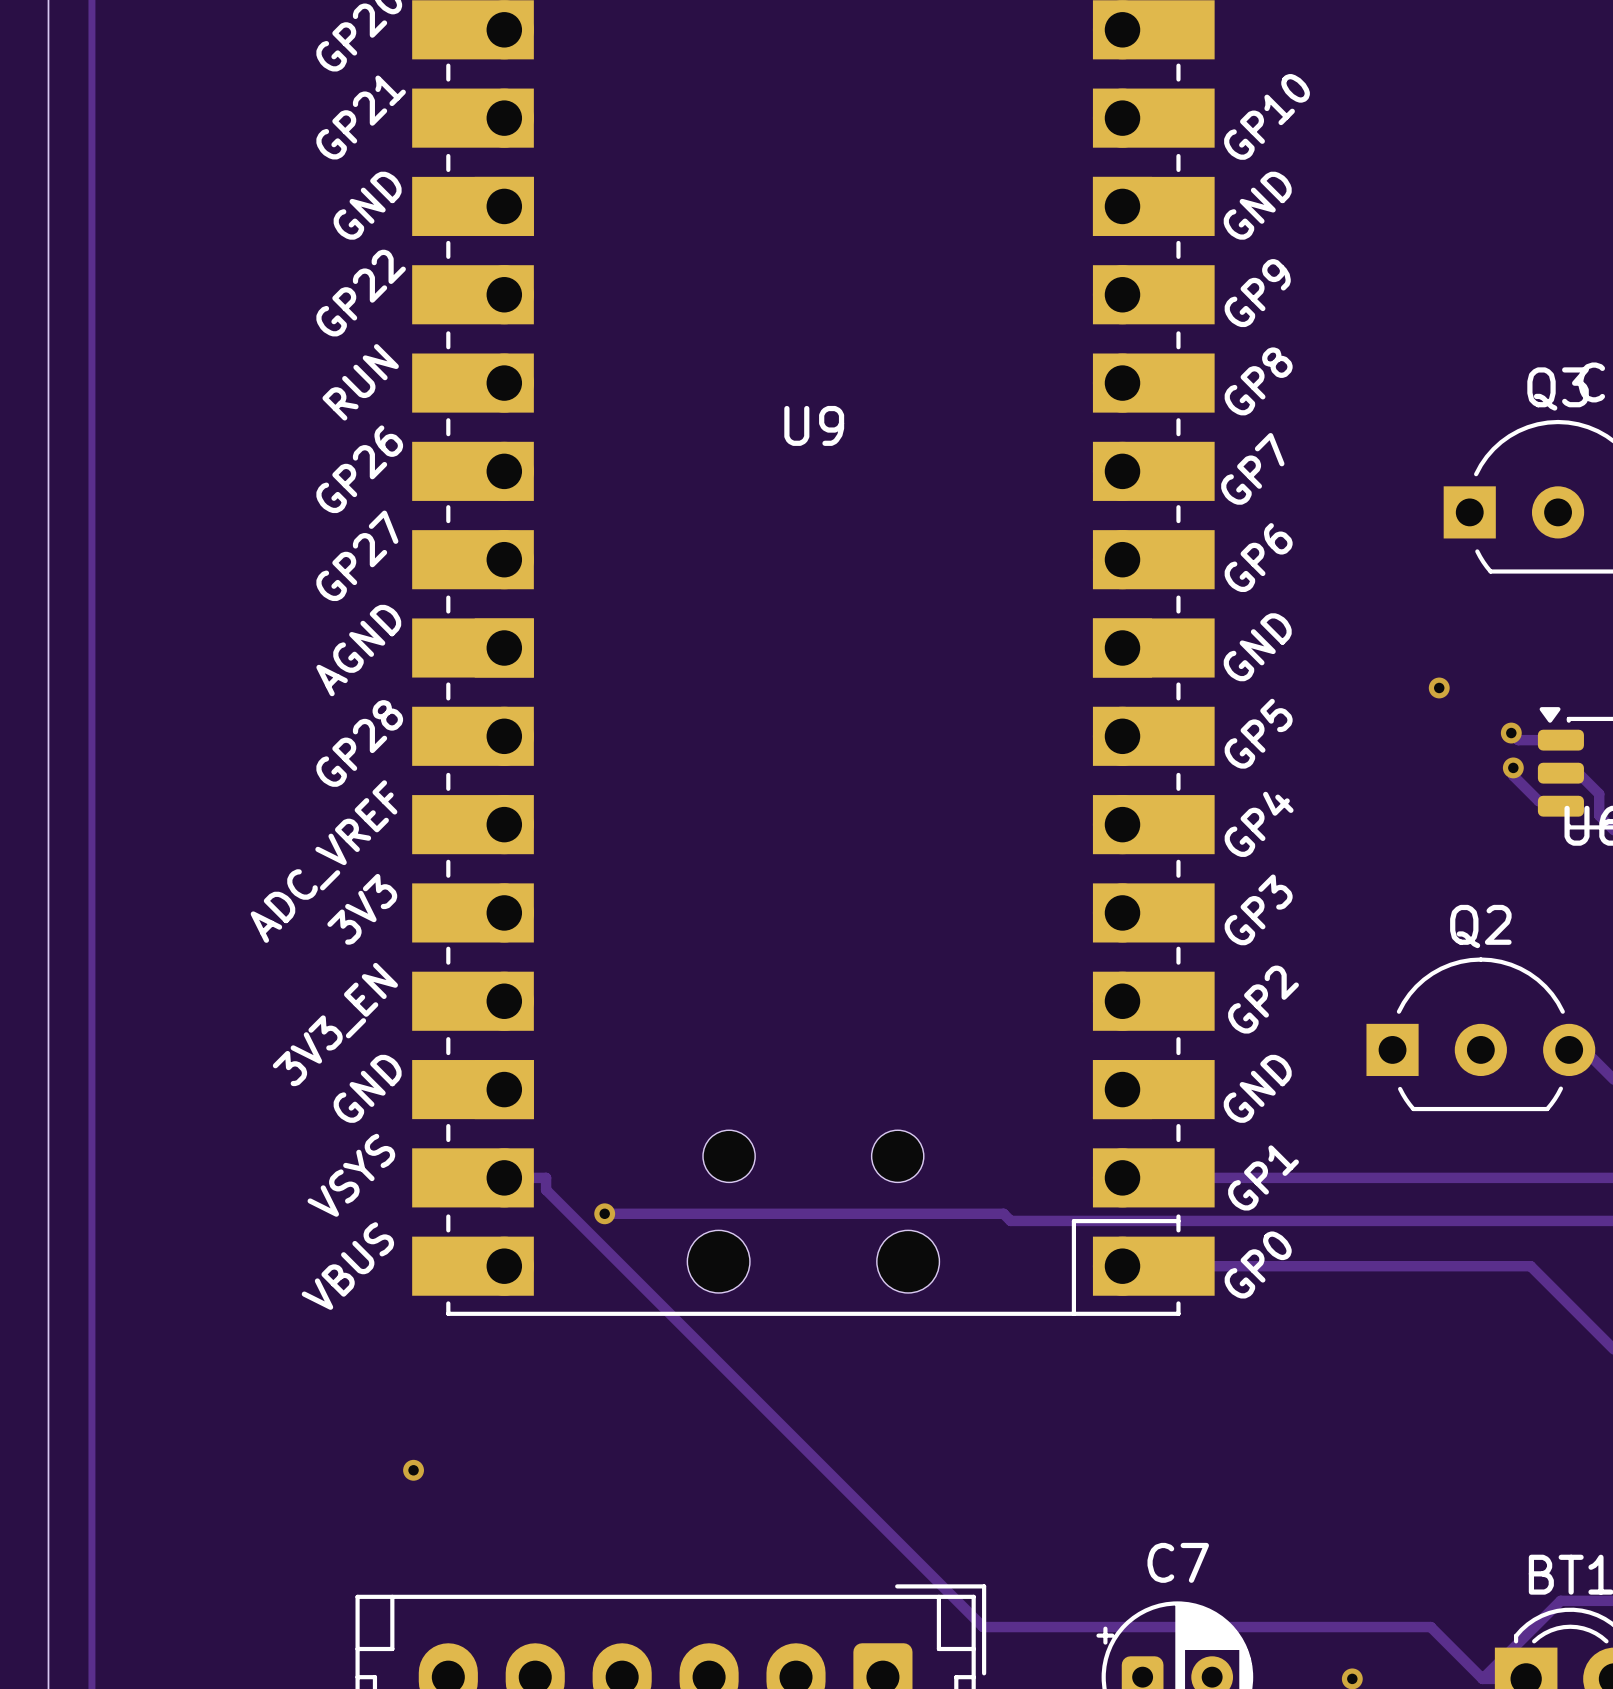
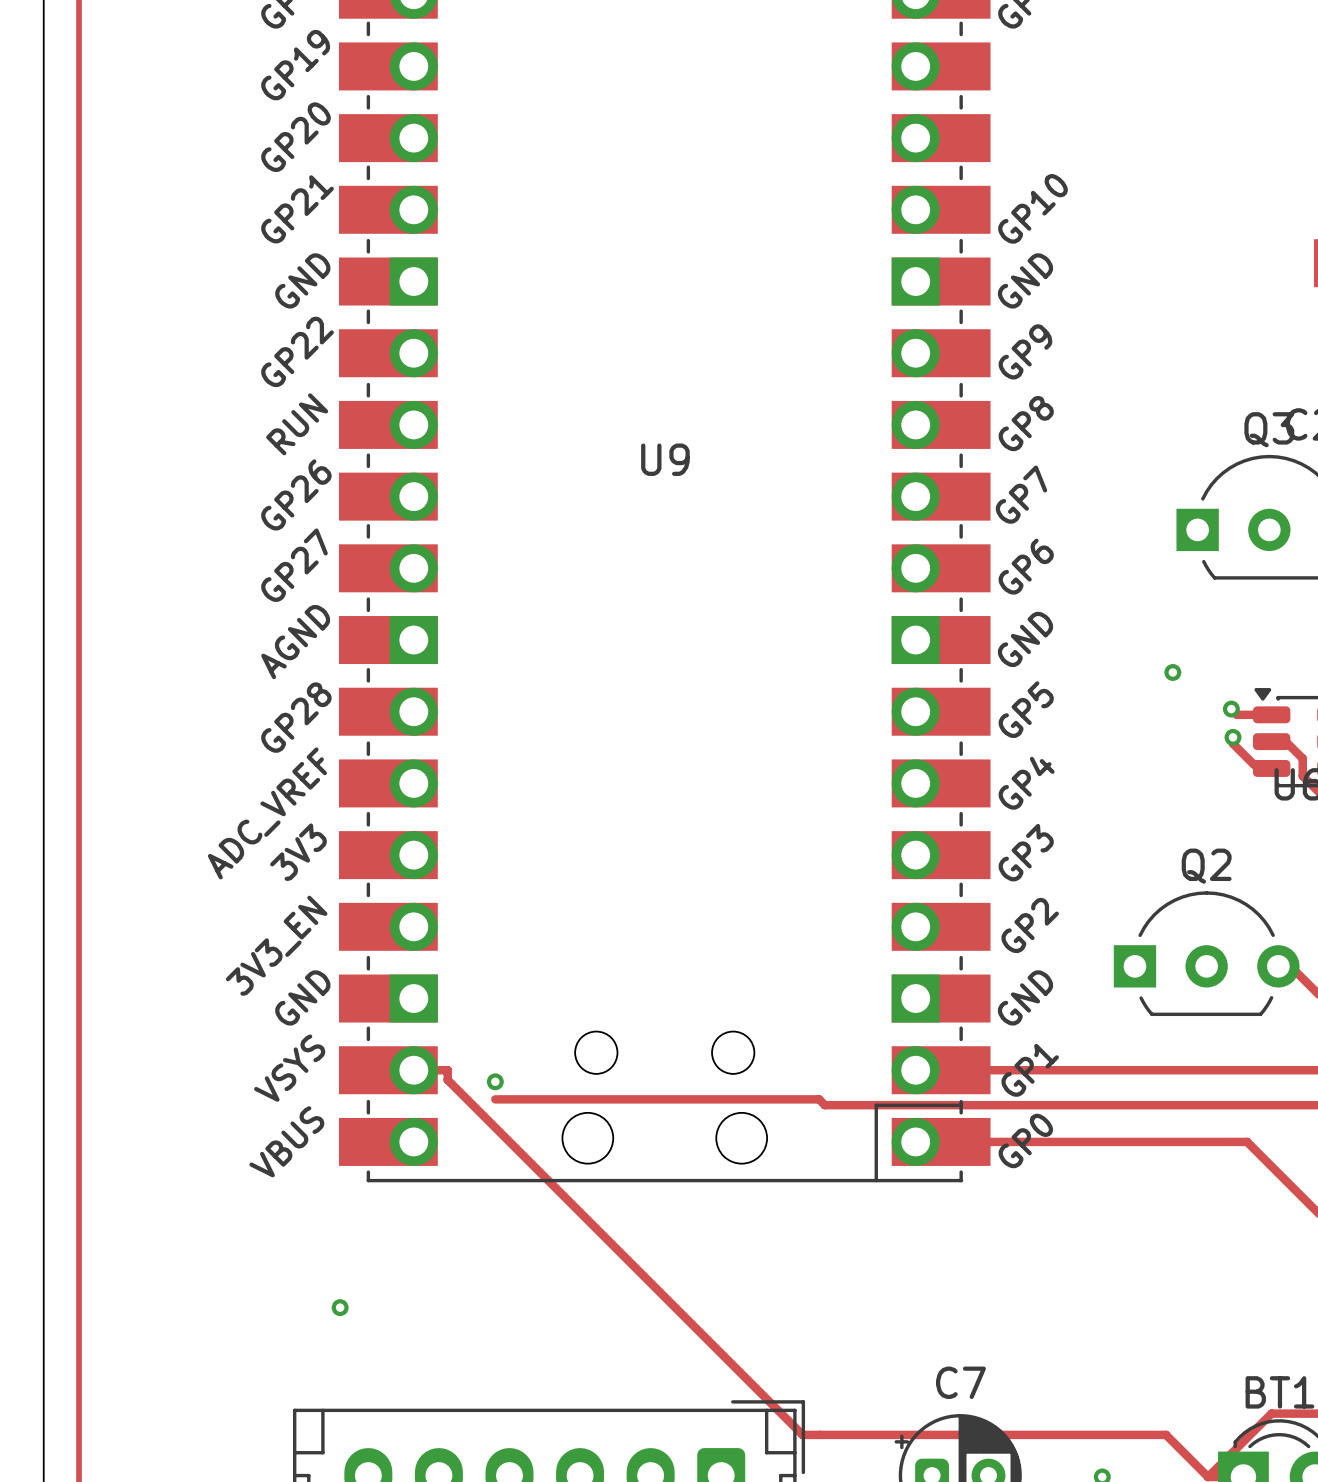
via position: (604, 1213) -> (495, 1081)

